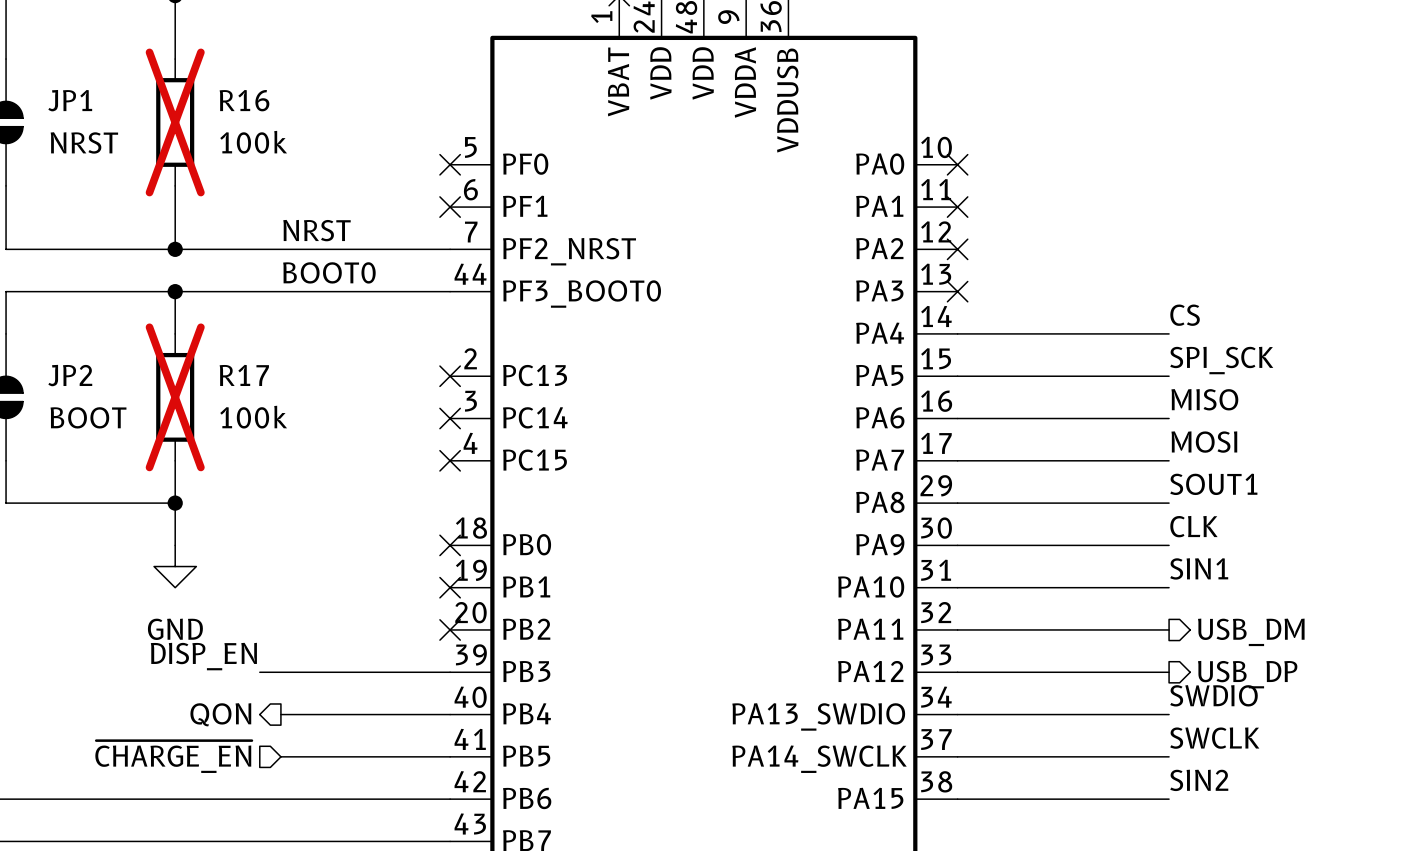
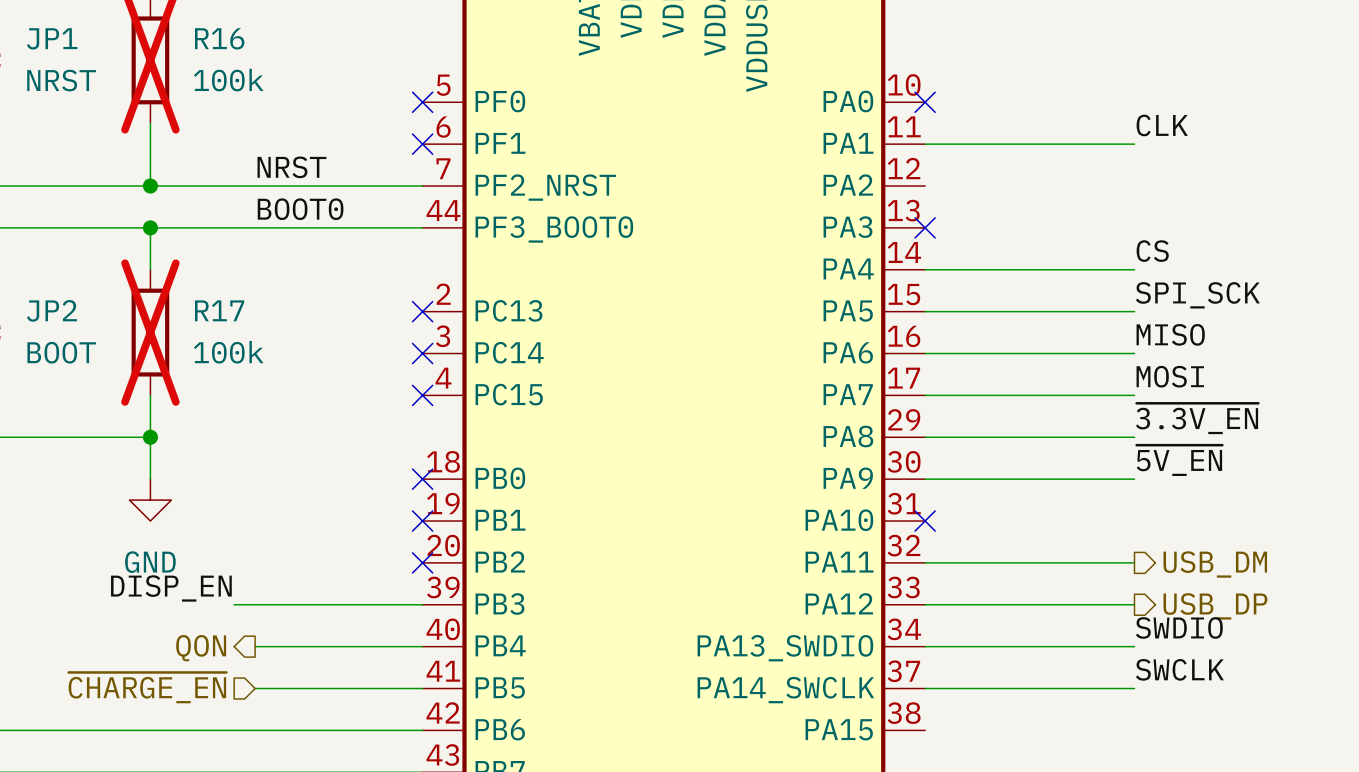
label: none -> CLK (1162, 125)
no-connect mark: (957, 207) -> none
no-connect mark: (957, 249) -> none
label: SOUT1 (1213, 484) -> ~{3.3V_EN} (1197, 418)
label: CLK (1193, 526) -> ~{5V_EN} (1179, 460)
label: SIN1 (1199, 568) -> none
wire: (957, 587) (1169, 587) -> (925, 144) (1134, 144)
no-connect mark: none -> (925, 521)
label: SIN2 (1199, 780) -> none
wire: (957, 799) (1169, 799) -> none

